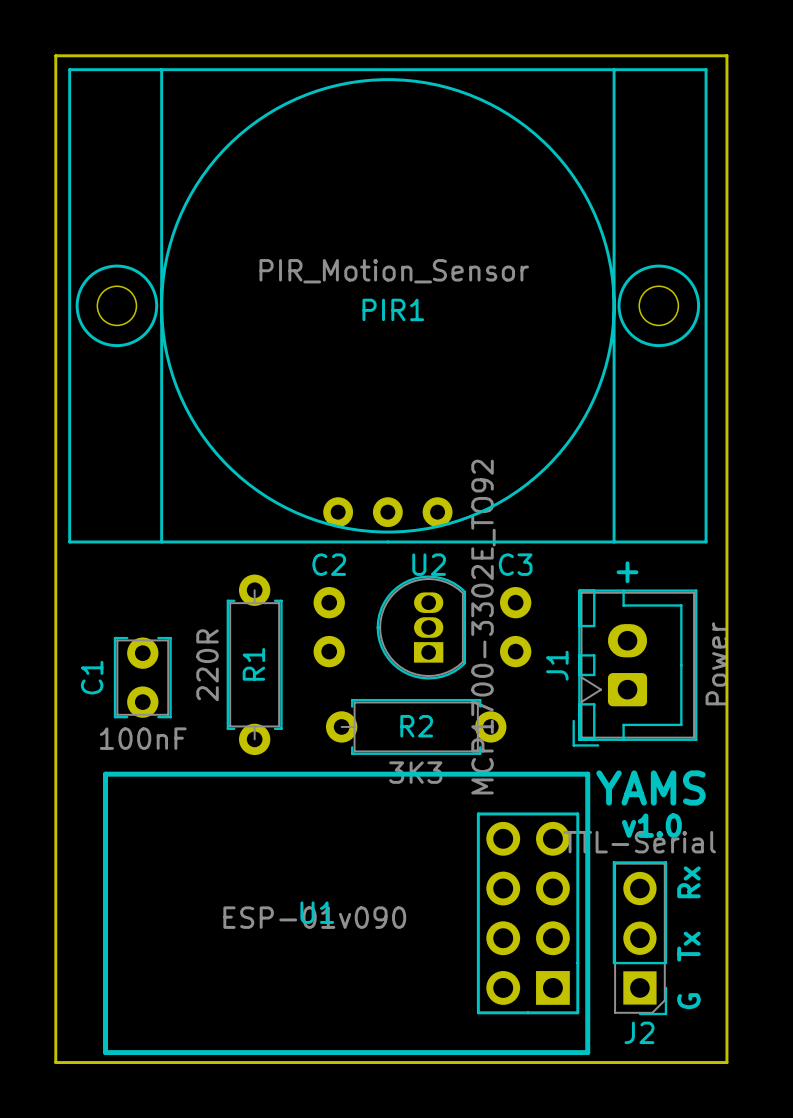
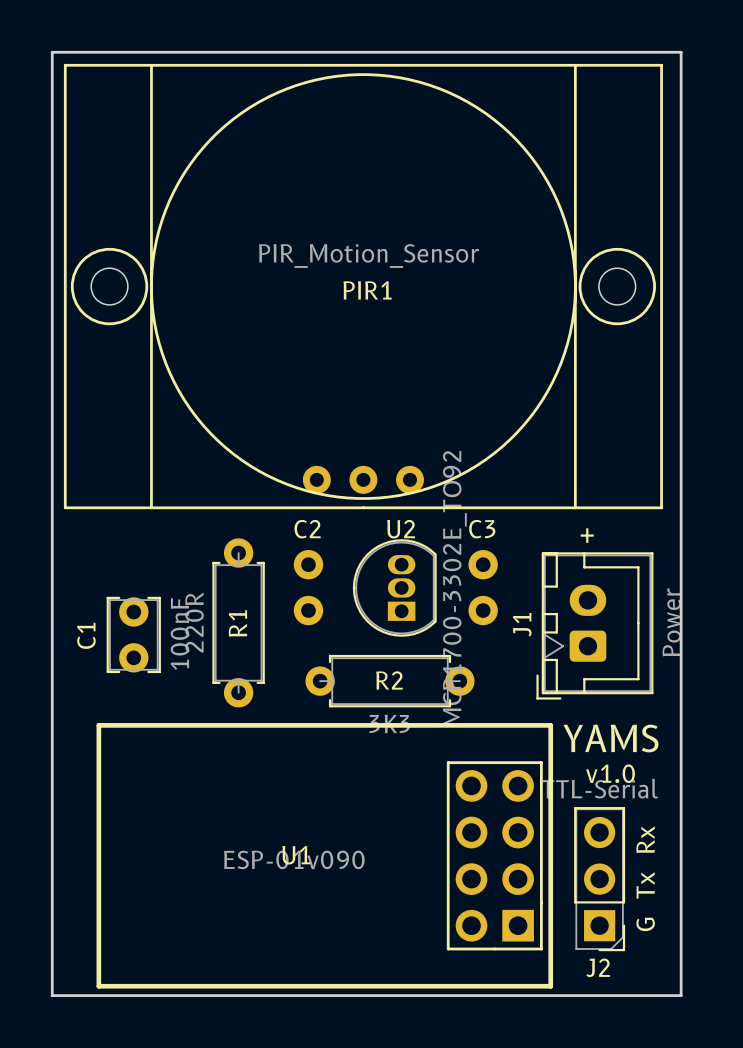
C1 value rotation: 0° (143, 738) -> 90° counterclockwise (179, 634)

